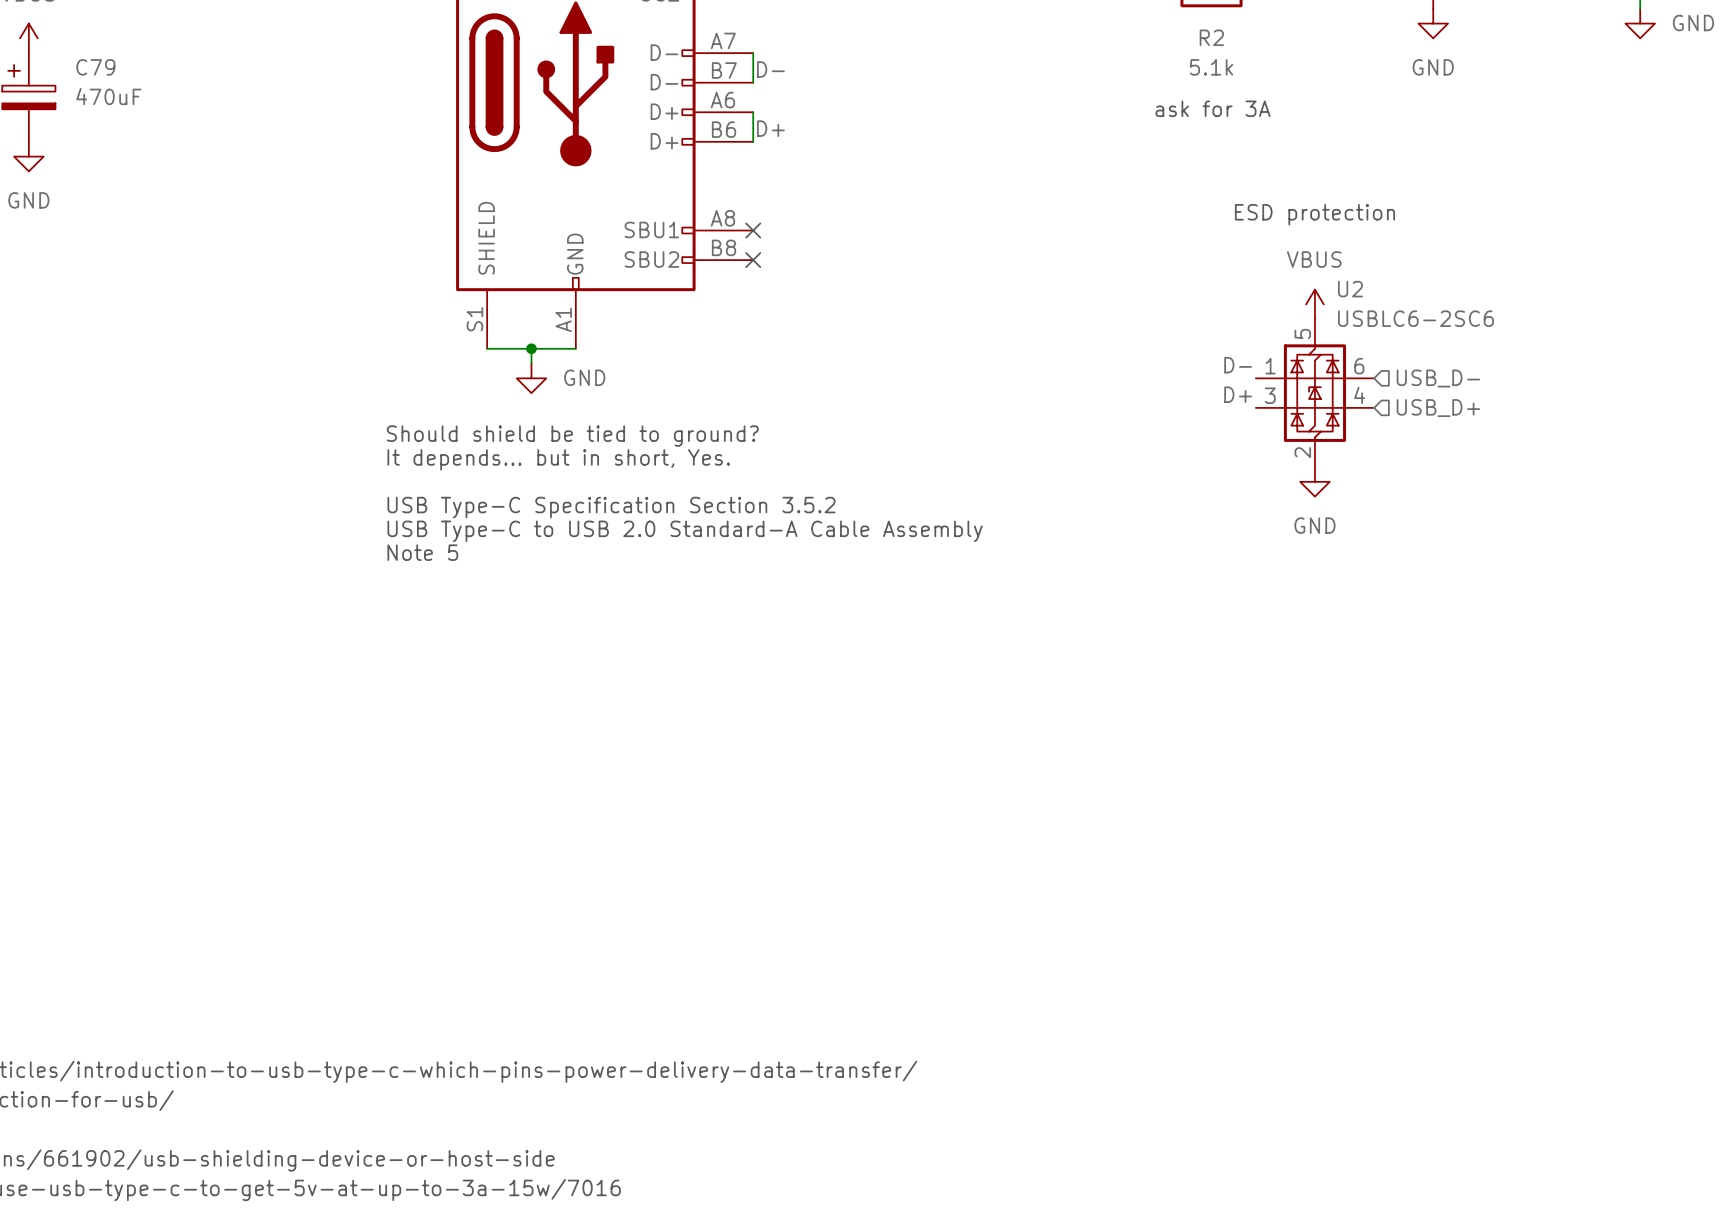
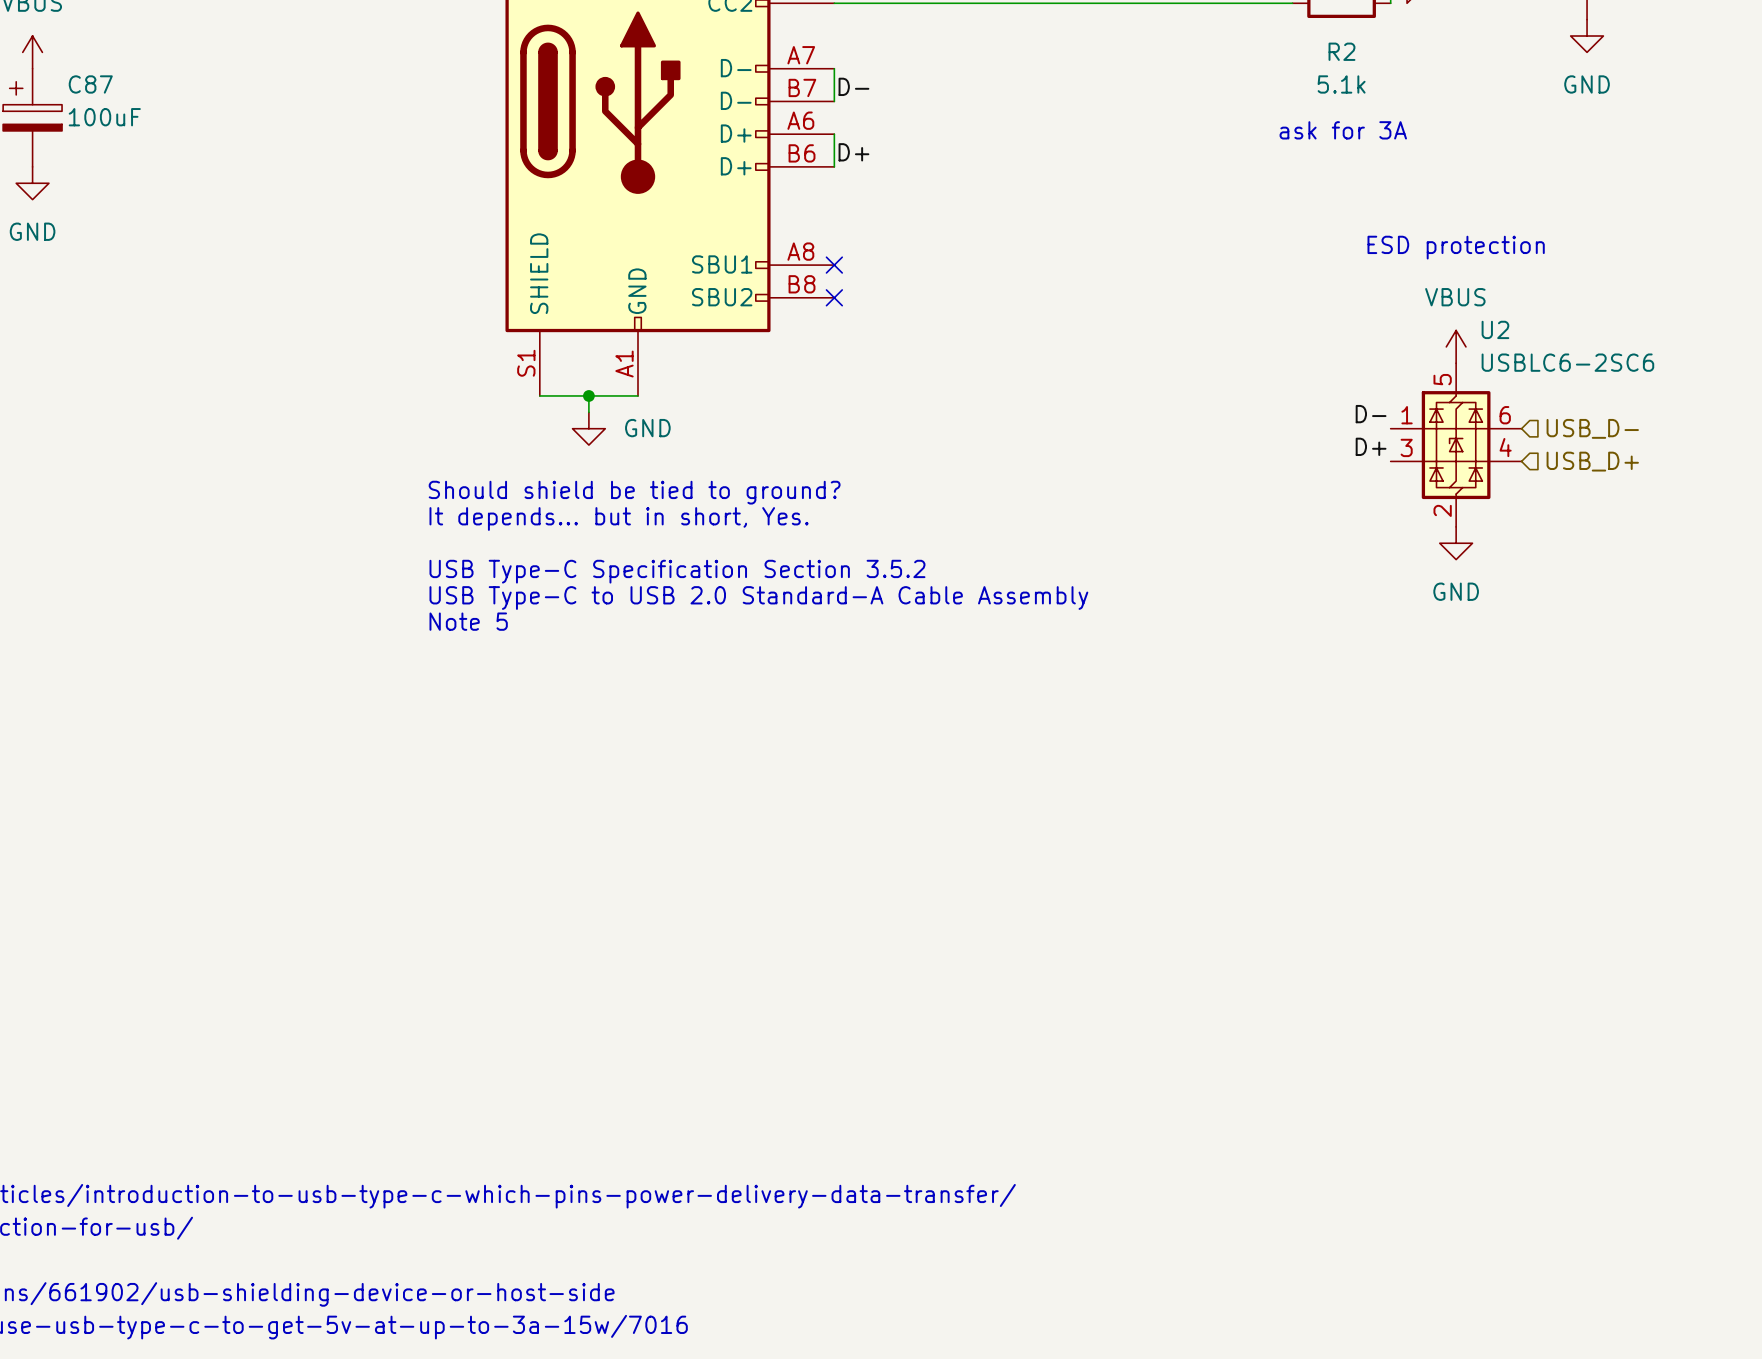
C79 name: C79 (95, 67) -> C87 (90, 84)
C79 value: 470uF (108, 96) -> 100uF (104, 117)

